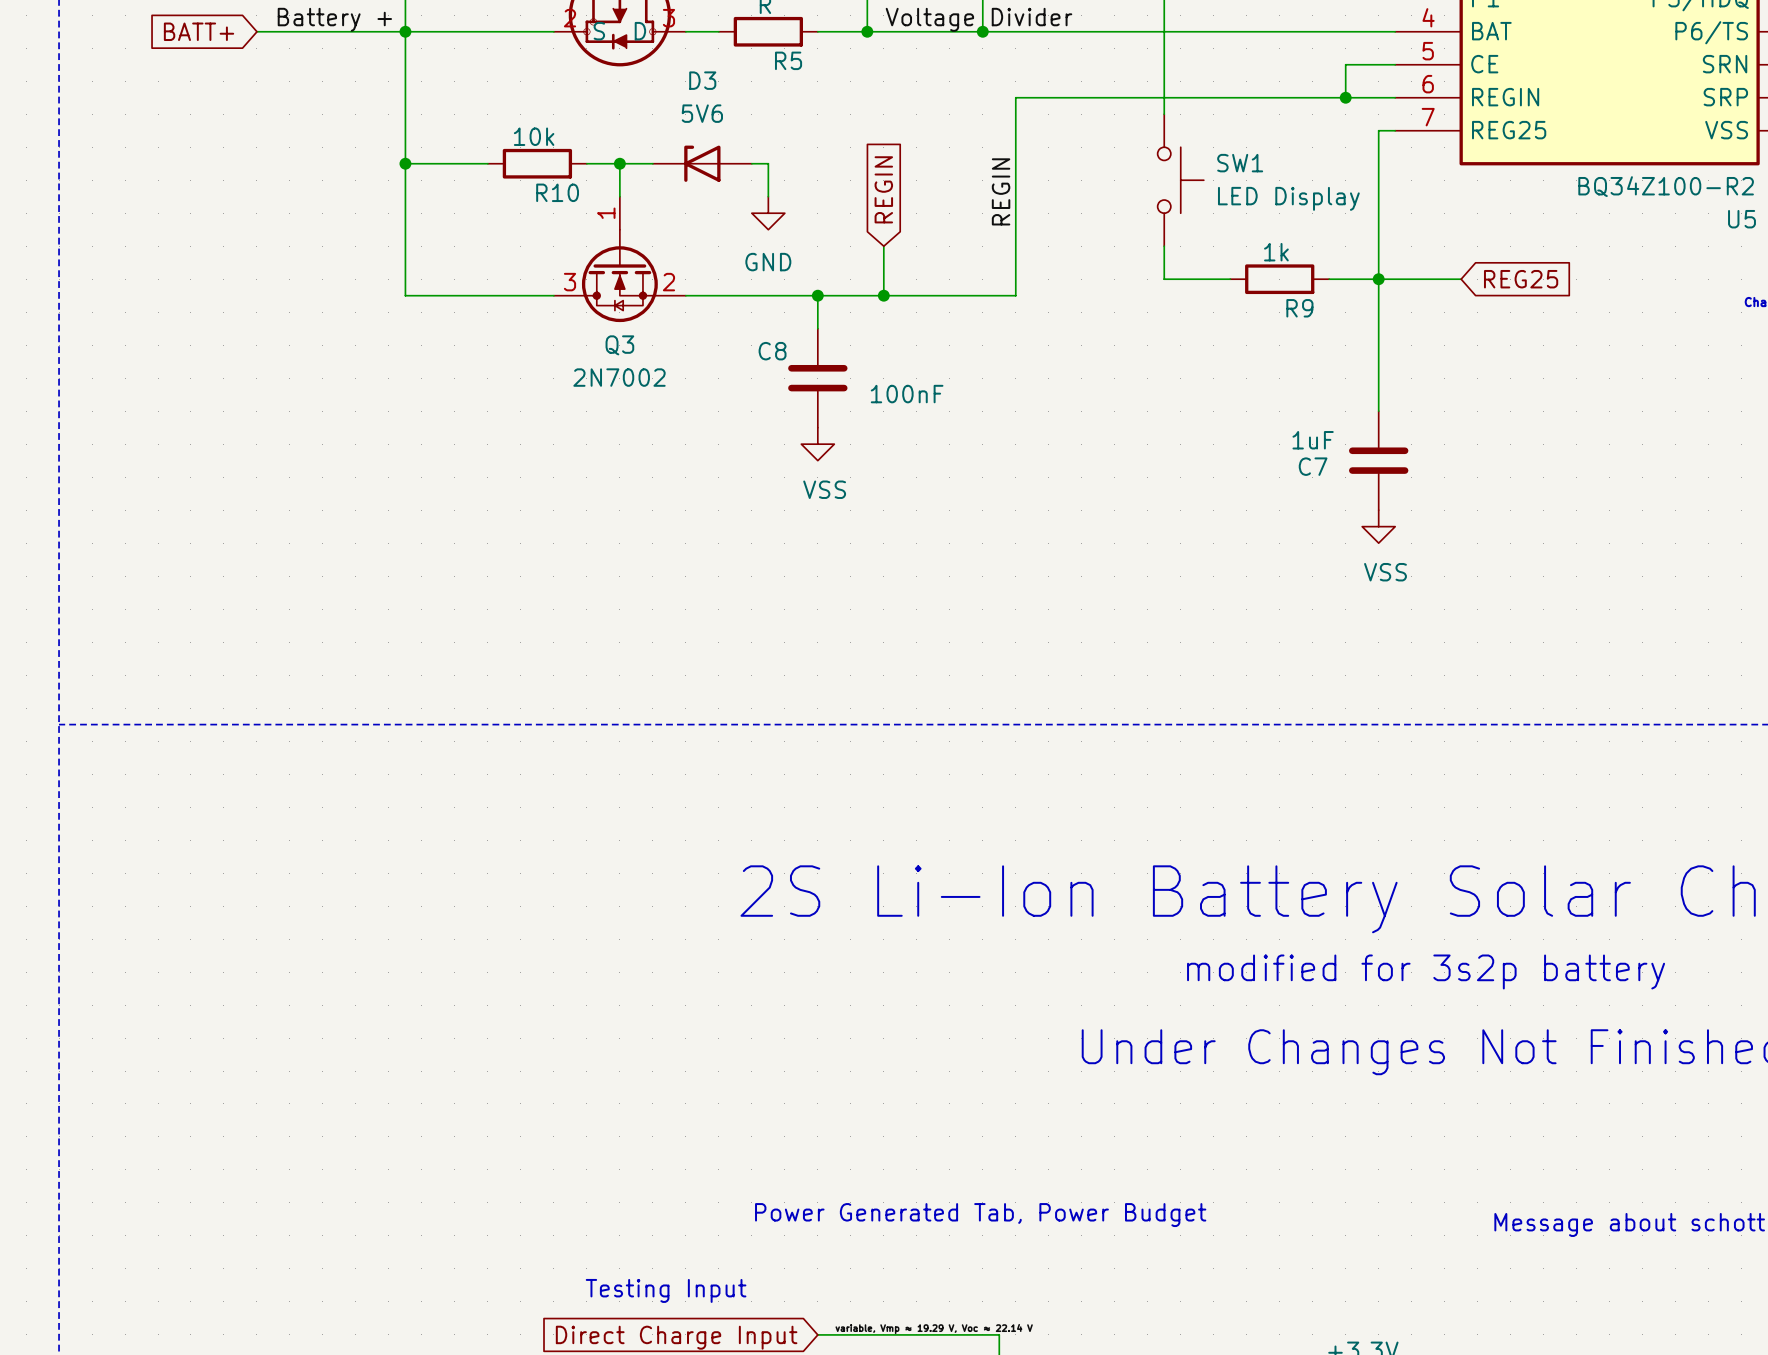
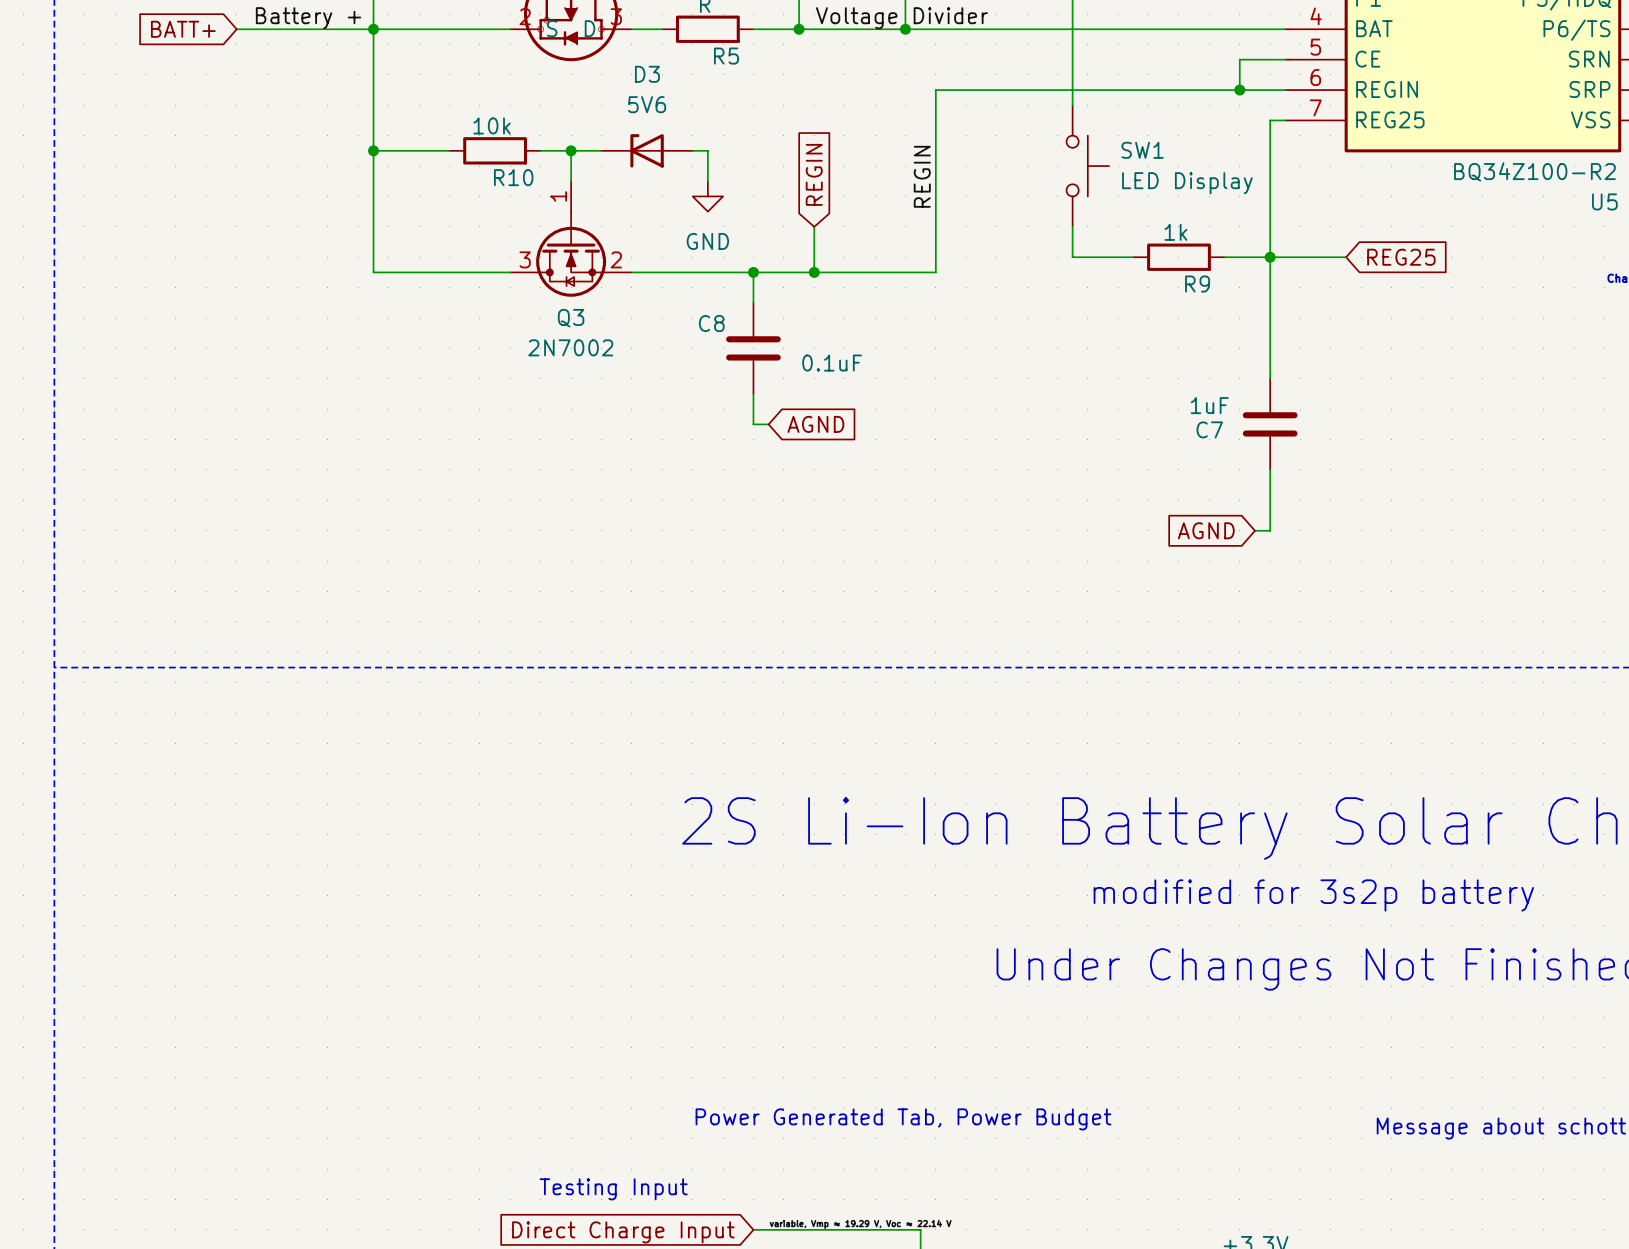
C8 value: 100nF (907, 394) -> 0.1uF (832, 363)
wire: none -> (753, 394) (753, 424) (768, 424)
power symbol: VSS (817, 444) -> none
global label: none -> AGND (815, 424)
wire: none -> (1270, 469) (1270, 530) (1254, 530)
power symbol: VSS (1378, 526) -> none
global label: none -> AGND (1206, 530)

